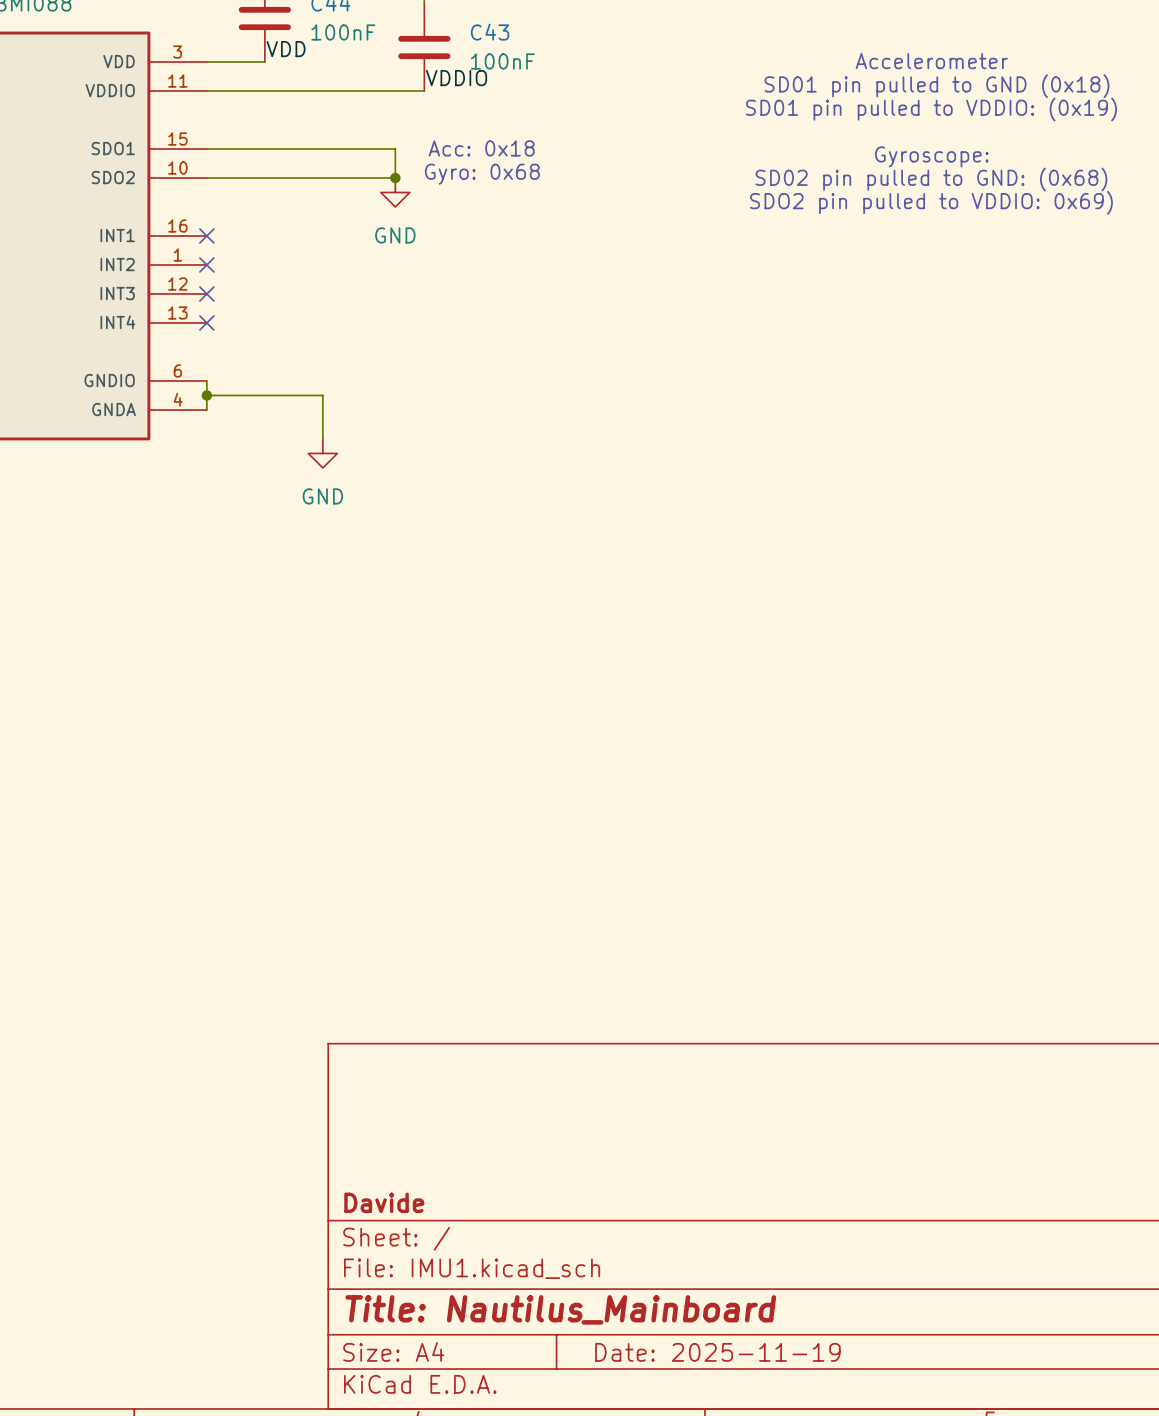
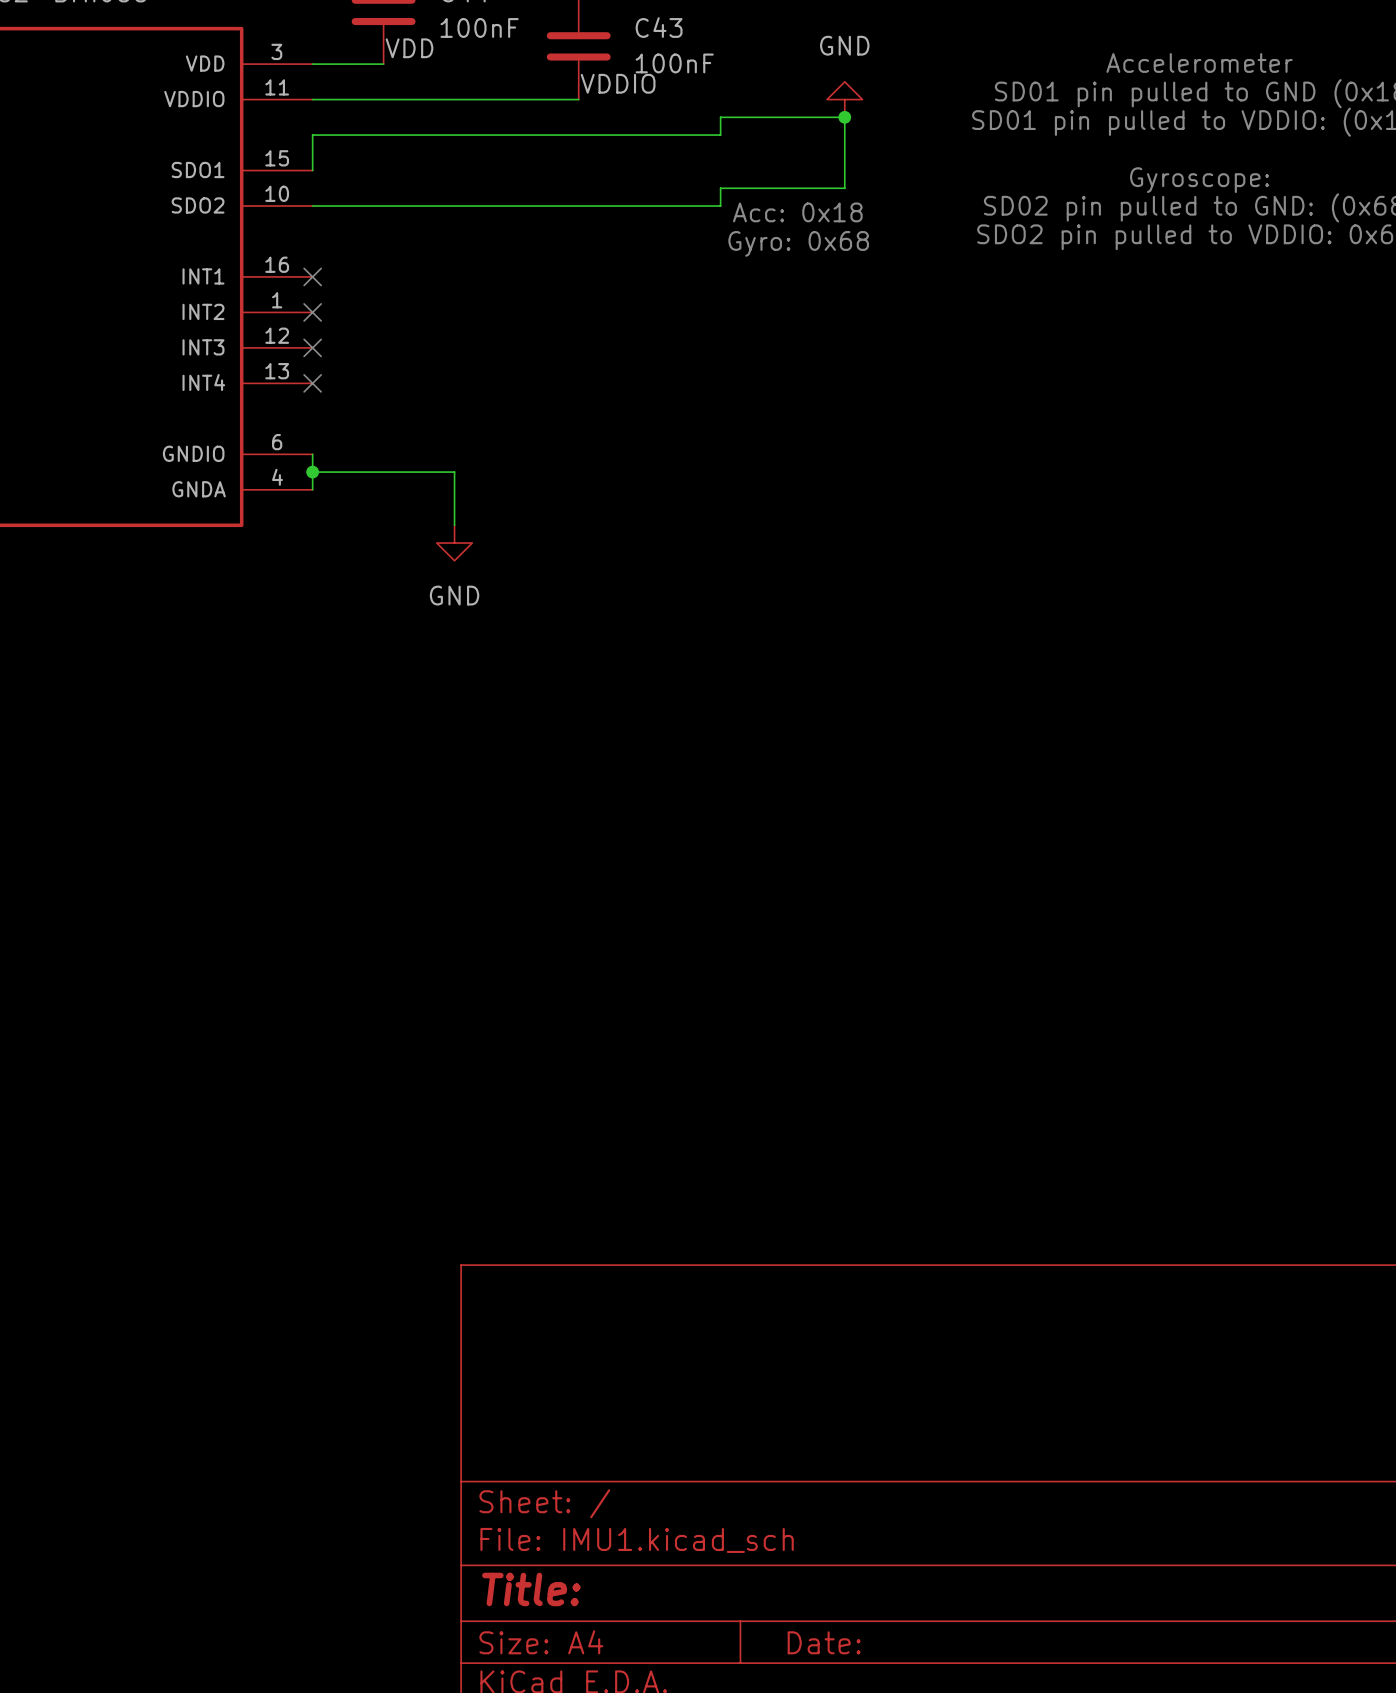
power symbol: none -> GND (844, 99)
junction: none -> (844, 117)
text position: Acc: 0x18 (481, 148) -> Acc: 0x18 (797, 212)
wire: (206, 149) (395, 149) (395, 177) -> (312, 170) (312, 135) (720, 135) (720, 117) (844, 117) (844, 188) (720, 188) (720, 206) (543, 206)
text position: Gyro: 0x68 (482, 174) -> Gyro: 0x68 (798, 243)
junction: (395, 177) -> none
power symbol: GND (395, 192) -> none
title block: Davide (384, 1202) -> none
title block: Title: Nautilus_Mainboard (560, 1309) -> Title: (531, 1589)
title block: Date: 2025-11-19 (717, 1352) -> Date: (824, 1642)

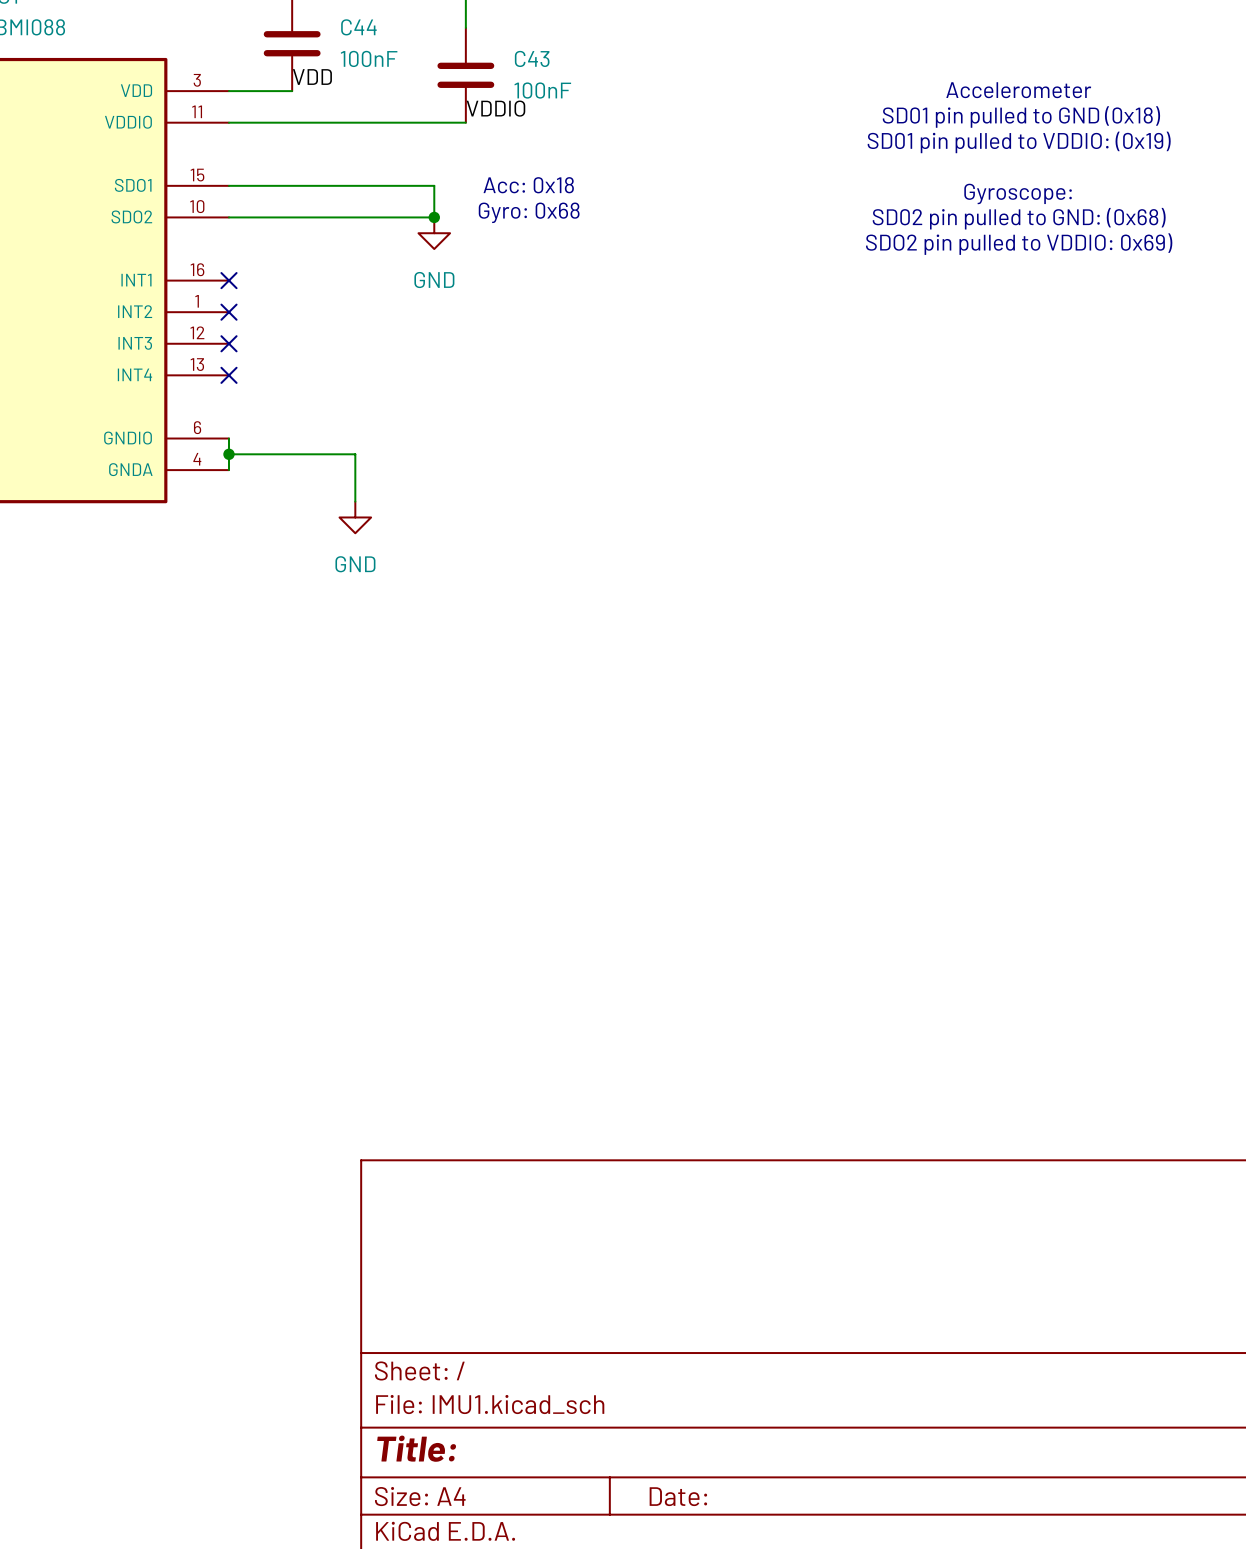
power symbol: GND (844, 99) -> none
junction: (844, 117) -> none
wire: (312, 170) (312, 135) (720, 135) (720, 117) (844, 117) (844, 188) (720, 188) (720, 206) (543, 206) -> (228, 185) (434, 185) (434, 217)
junction: none -> (434, 217)
text position: Acc: 0x18 (797, 212) -> Acc: 0x18 (528, 185)
power symbol: none -> GND (434, 233)
text position: Gyro: 0x68 (798, 243) -> Gyro: 0x68 (529, 212)

